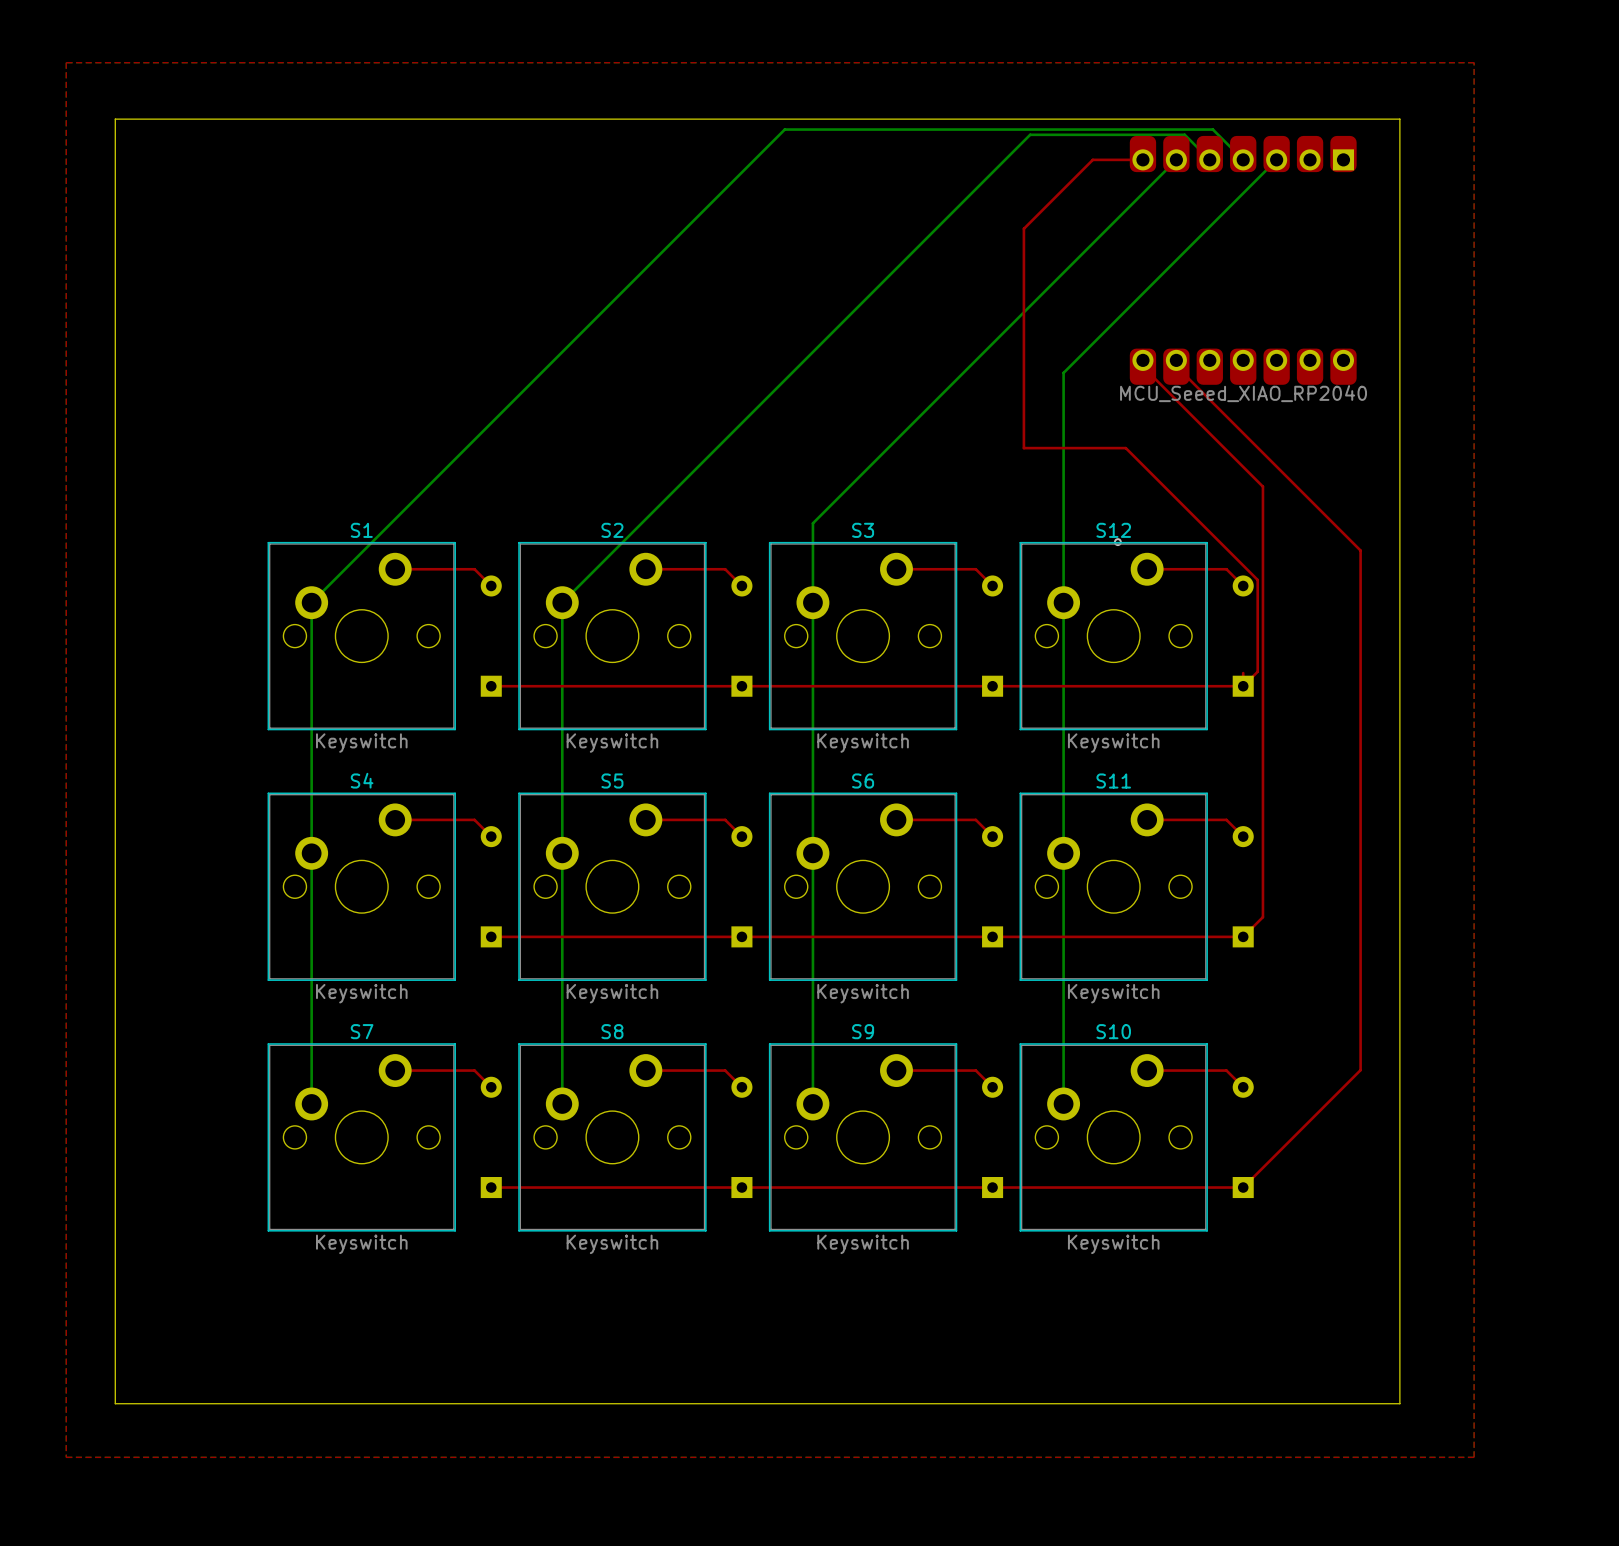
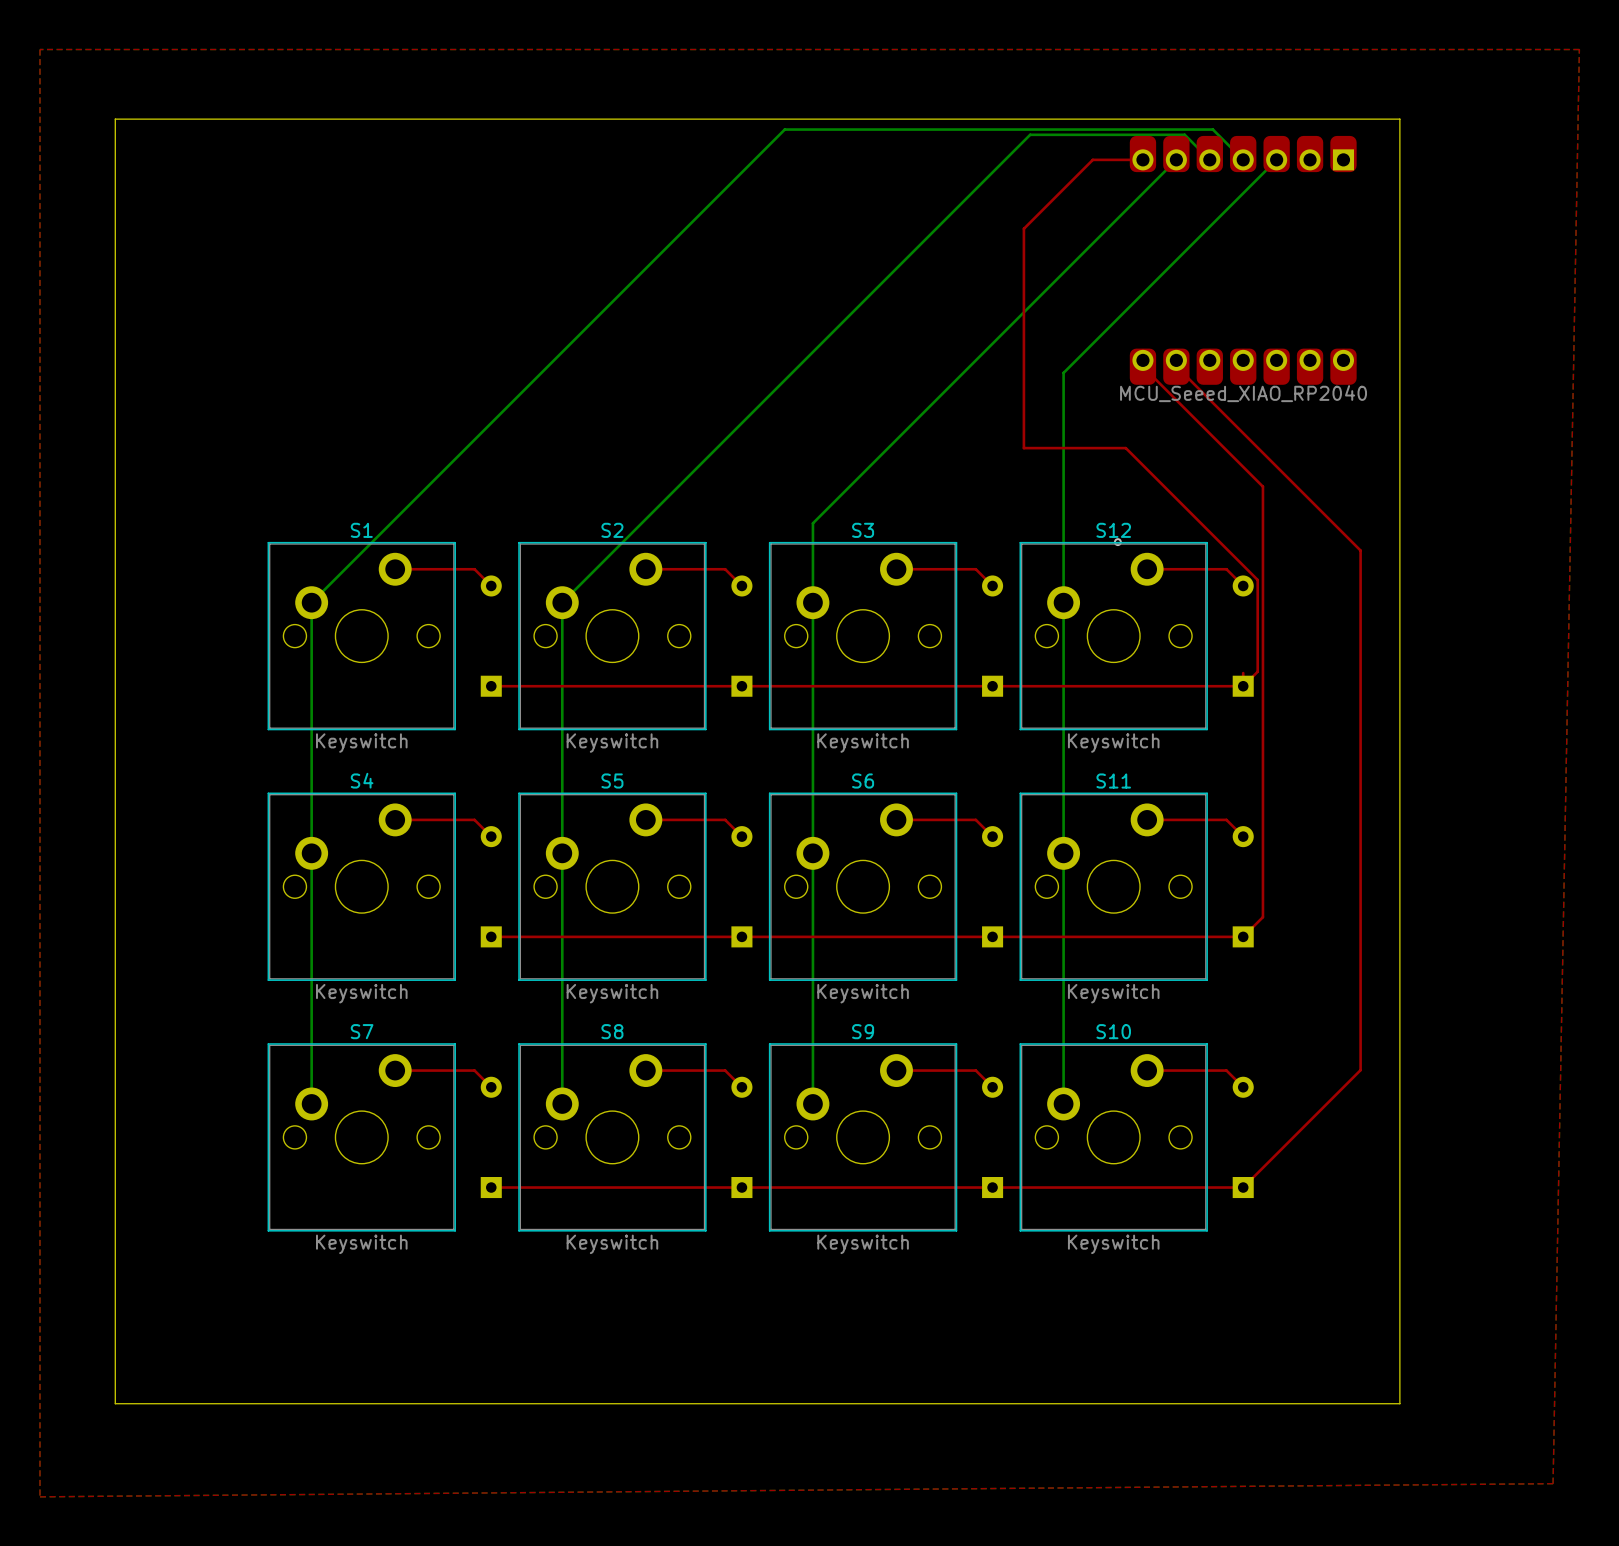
top zone outline: (66, 62) (1474, 62) (1474, 1457) (66, 1457) (66, 62) -> (39, 49) (39, 1496) (1553, 1483) (1579, 49) (39, 49)

